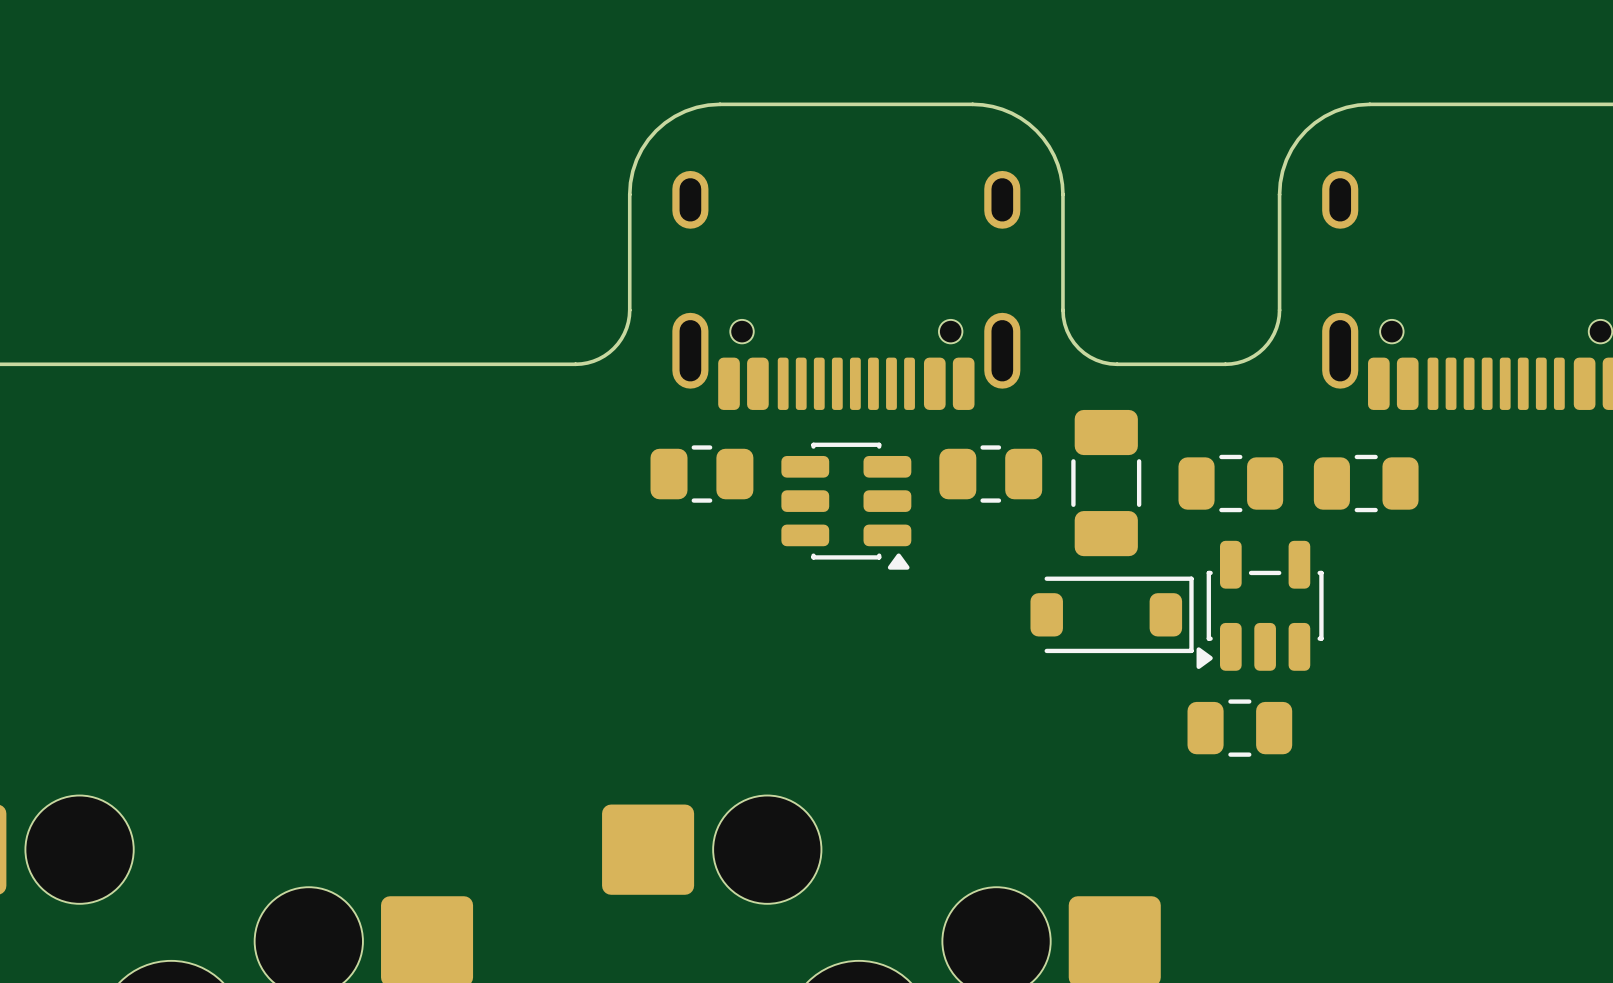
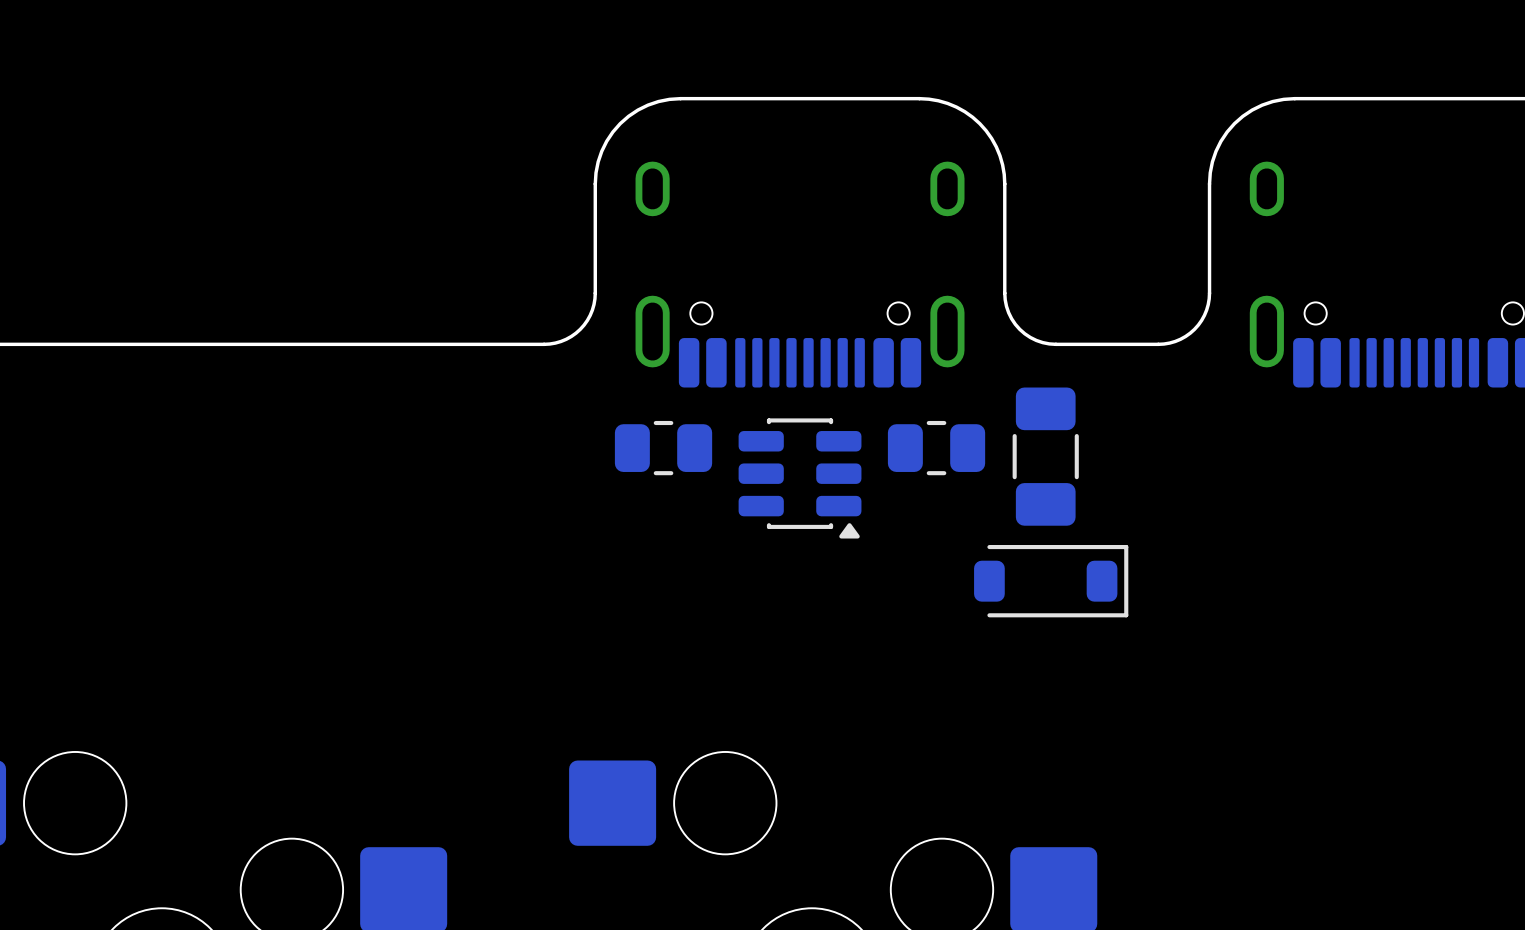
part: (1230, 483) -> none
part: (1366, 483) -> none
part: (1260, 605) -> none
part: (1239, 728) -> none

